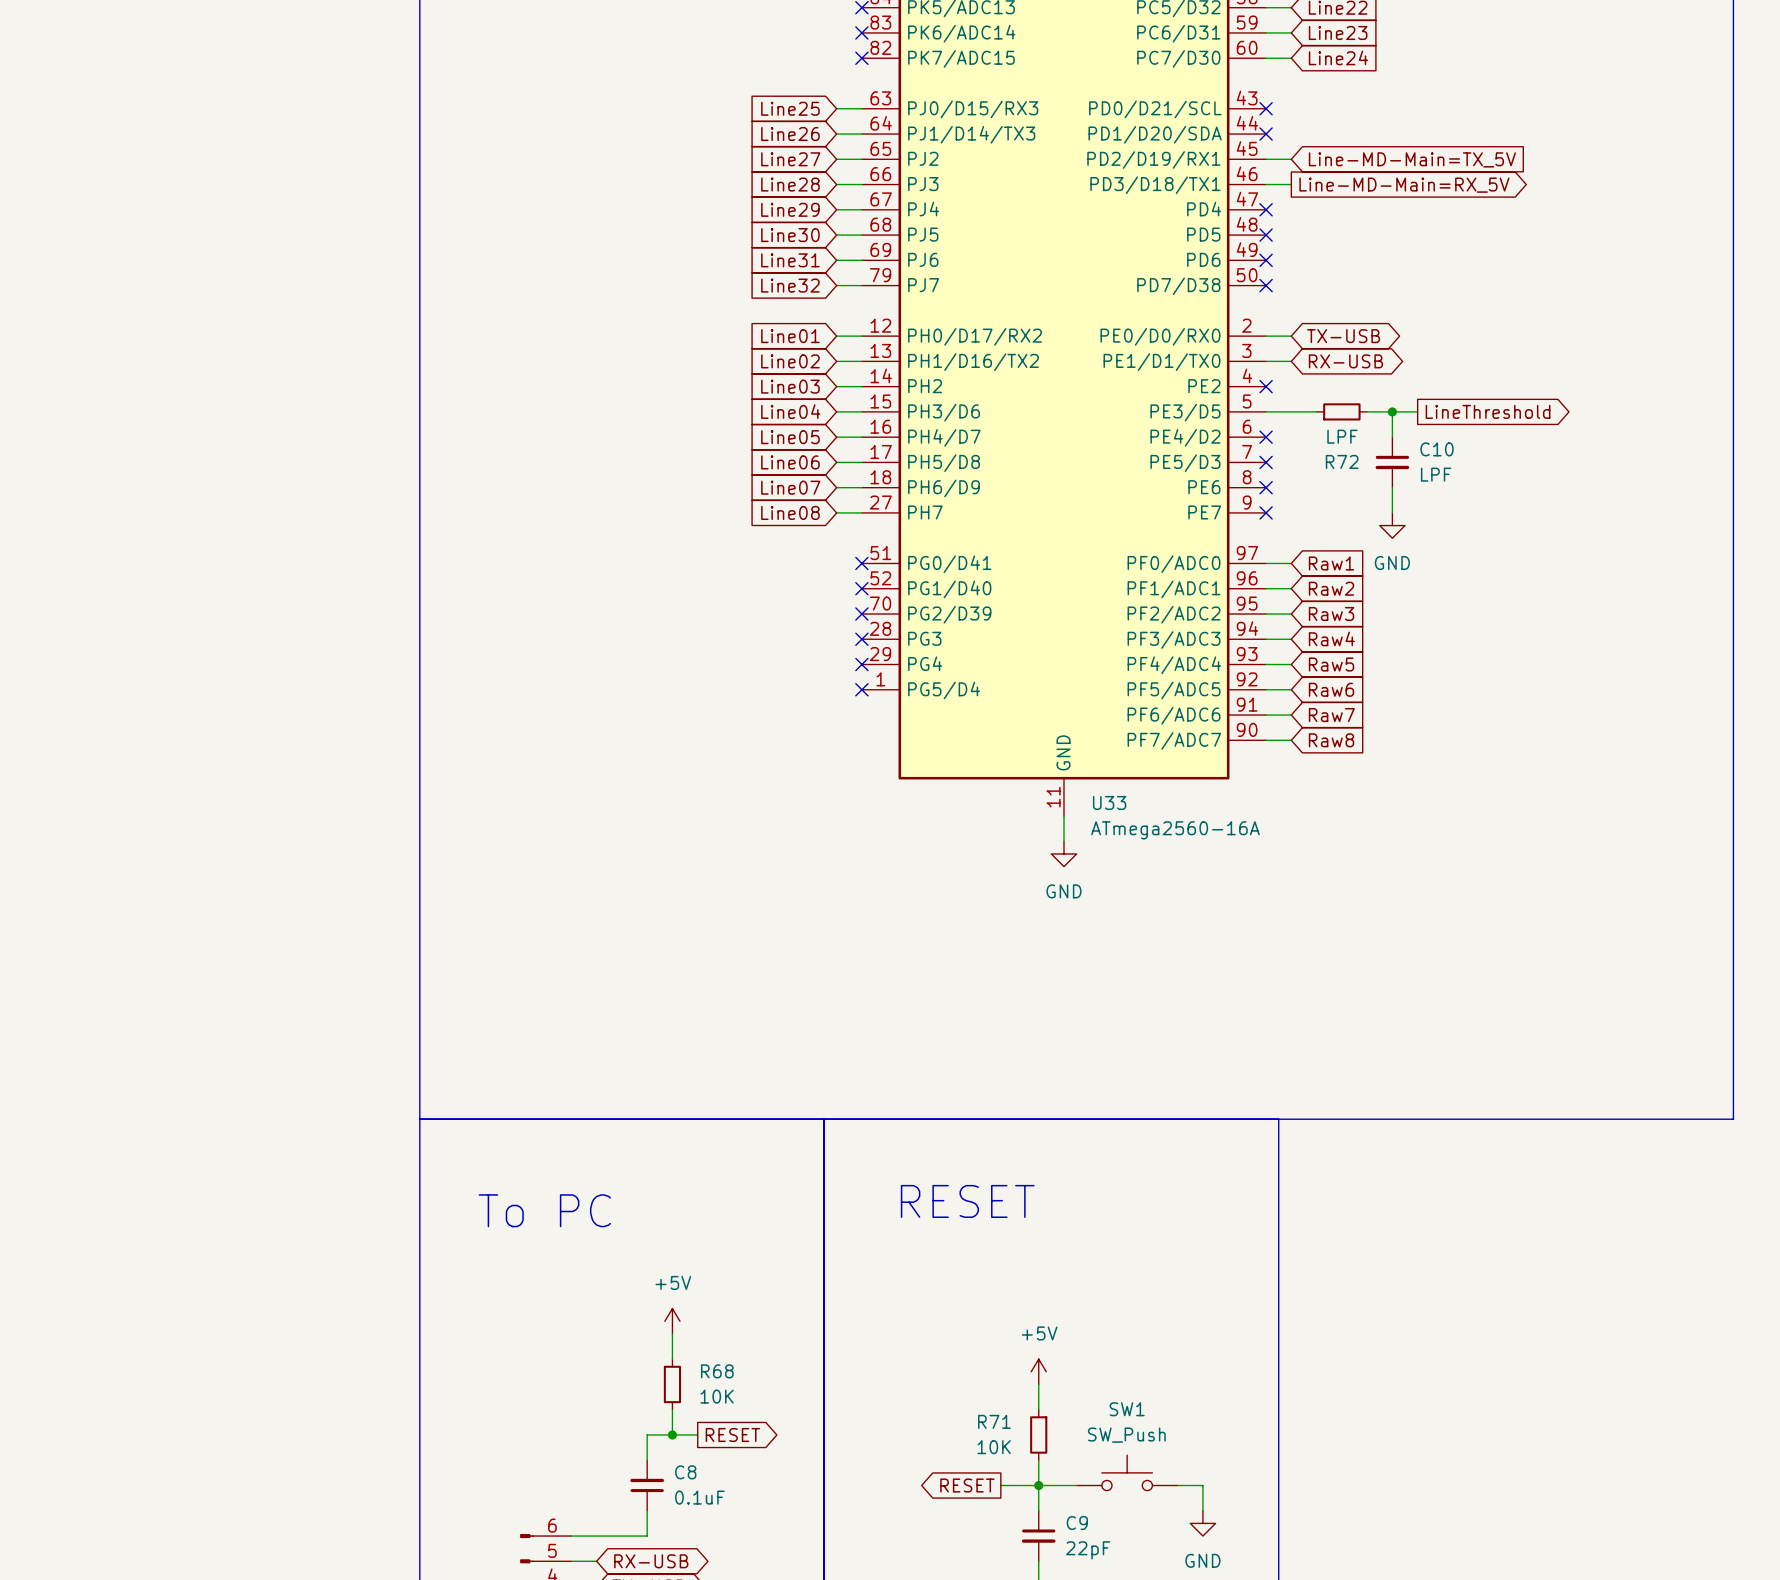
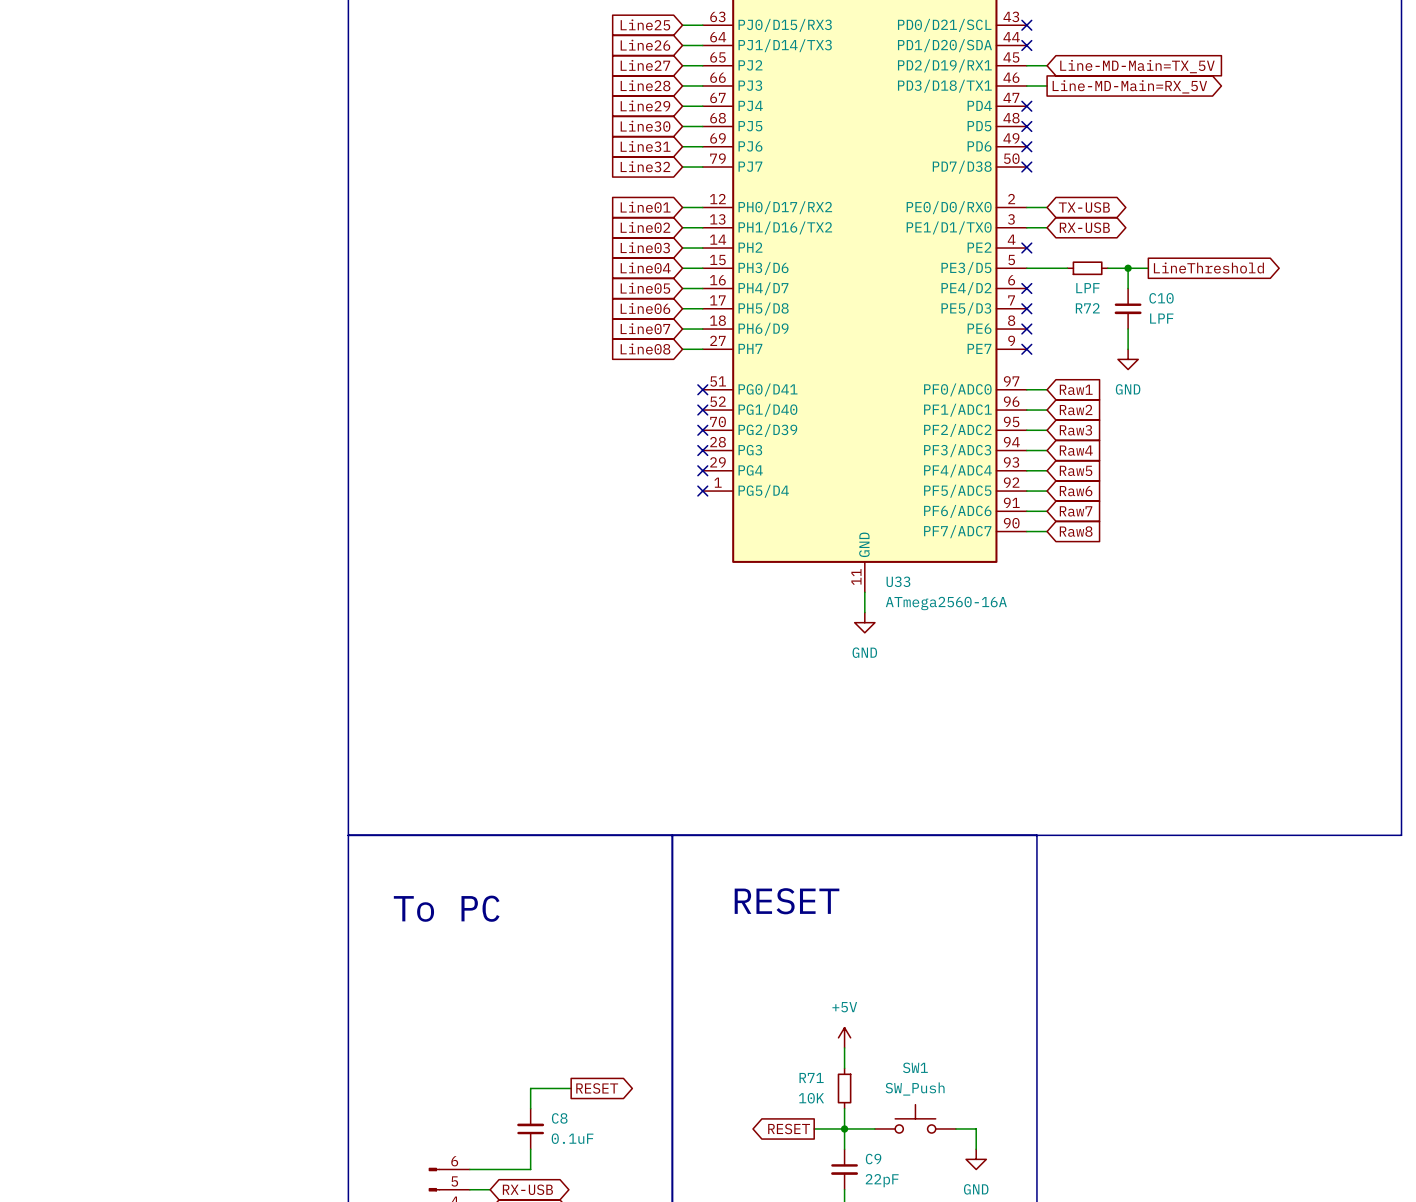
power symbol: +5V (672, 1321) -> none
wire: (672, 1333) (672, 1359) -> none
R68: 10K (672, 1384) -> none
wire: (672, 1409) (672, 1434) -> none
junction: (672, 1434) -> none

